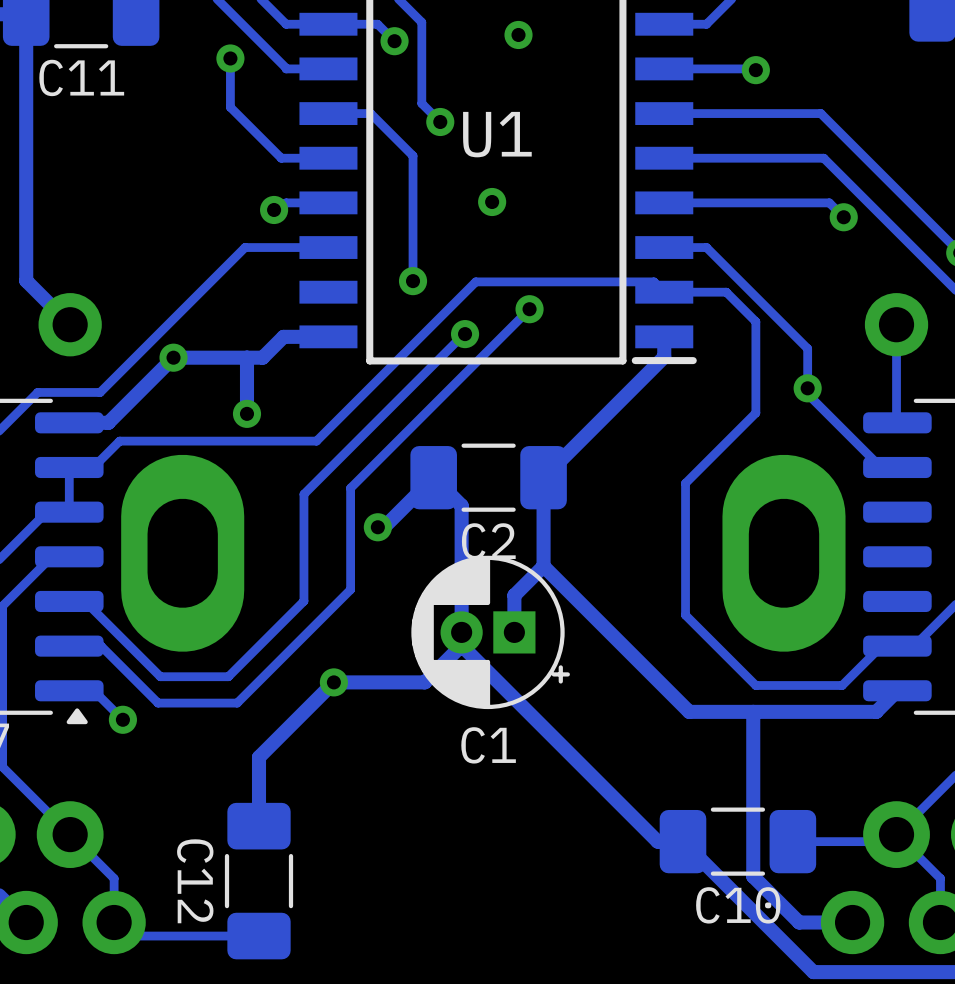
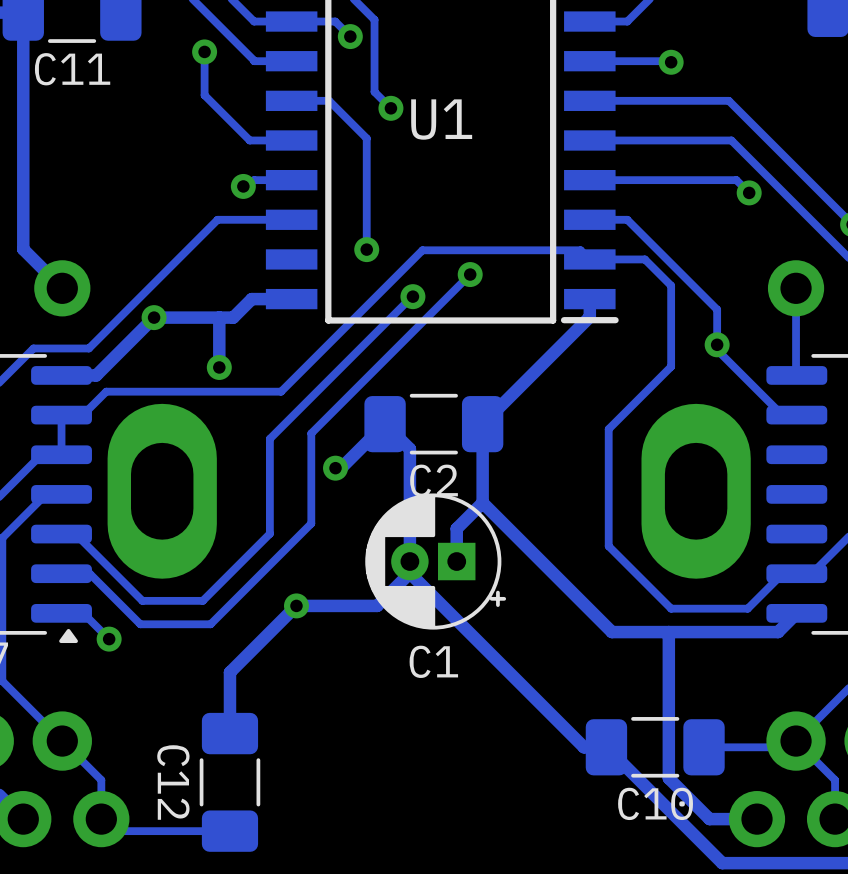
via: (518, 34) -> none
via: (492, 202) -> none

